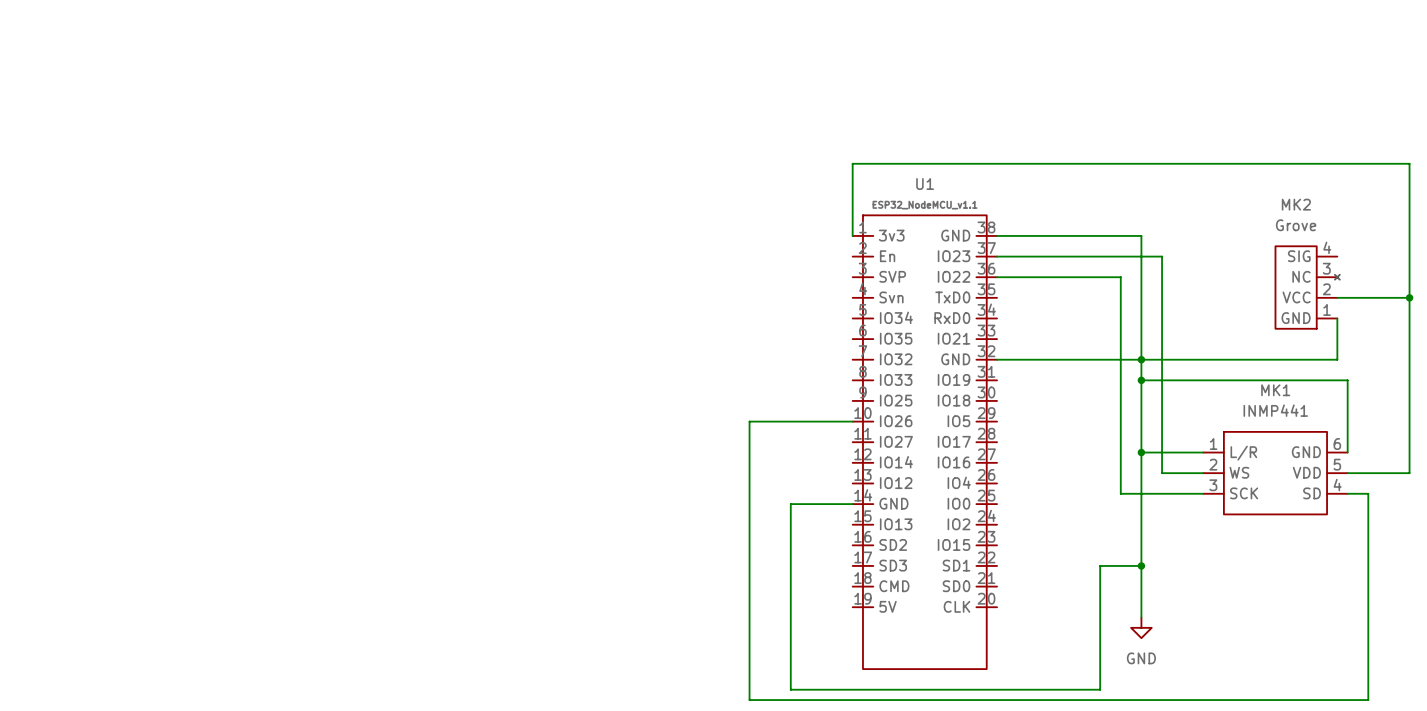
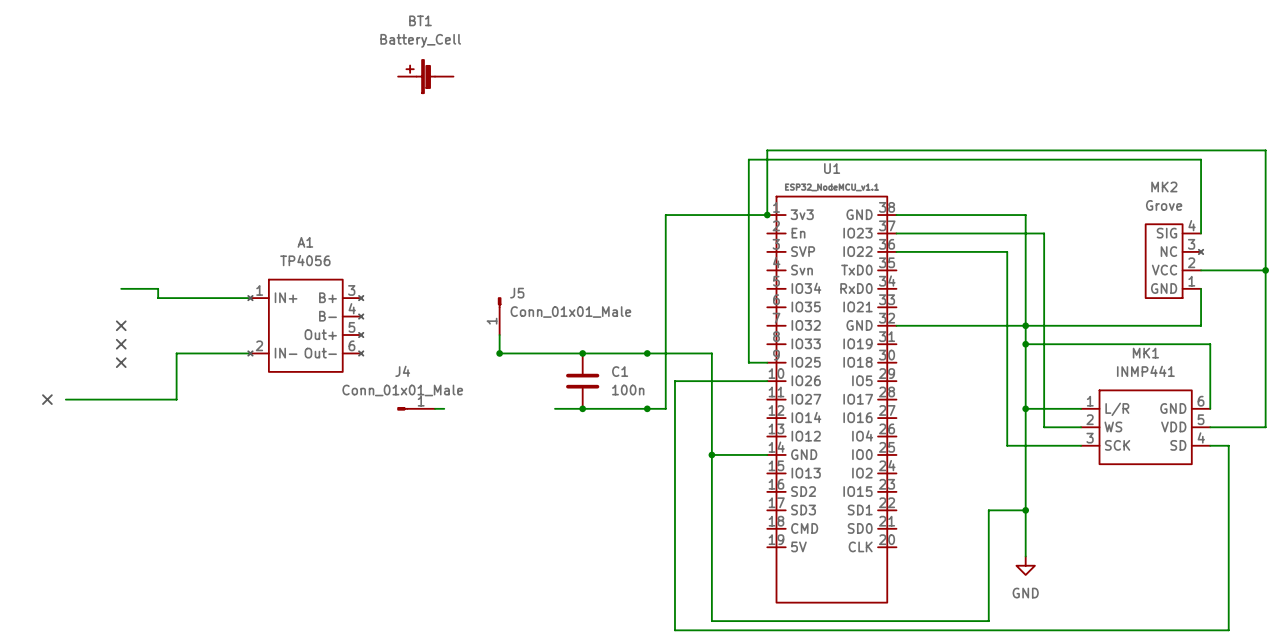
BT1: none -> Battery_Cell (425, 76)
wire: none -> (767, 215) (665, 215) (665, 408) (555, 408)
junction: none -> (767, 215)
wire: none -> (1201, 233) (1201, 159) (748, 159) (748, 362) (767, 362)
wire: none -> (121, 288) (158, 288) (158, 298) (250, 298)
J5: none -> Conn_01x01_Male (499, 316)
no-connect mark: none -> (121, 325)
A1: none -> TP4056 (305, 325)
wire: none -> (499, 335) (499, 353) (711, 353) (711, 454)
no-connect mark: none -> (121, 344)
wire: none -> (250, 353) (176, 353) (176, 399) (65, 399)
junction: none -> (499, 353)
junction: none -> (582, 353)
junction: none -> (647, 353)
no-connect mark: none -> (121, 362)
C1: none -> 100n (582, 381)
no-connect mark: none -> (47, 399)
J4: none -> Conn_01x01_Male (416, 408)
wire: none -> (435, 408) (444, 408)
junction: none -> (582, 408)
junction: none -> (647, 408)
junction: none -> (711, 454)

